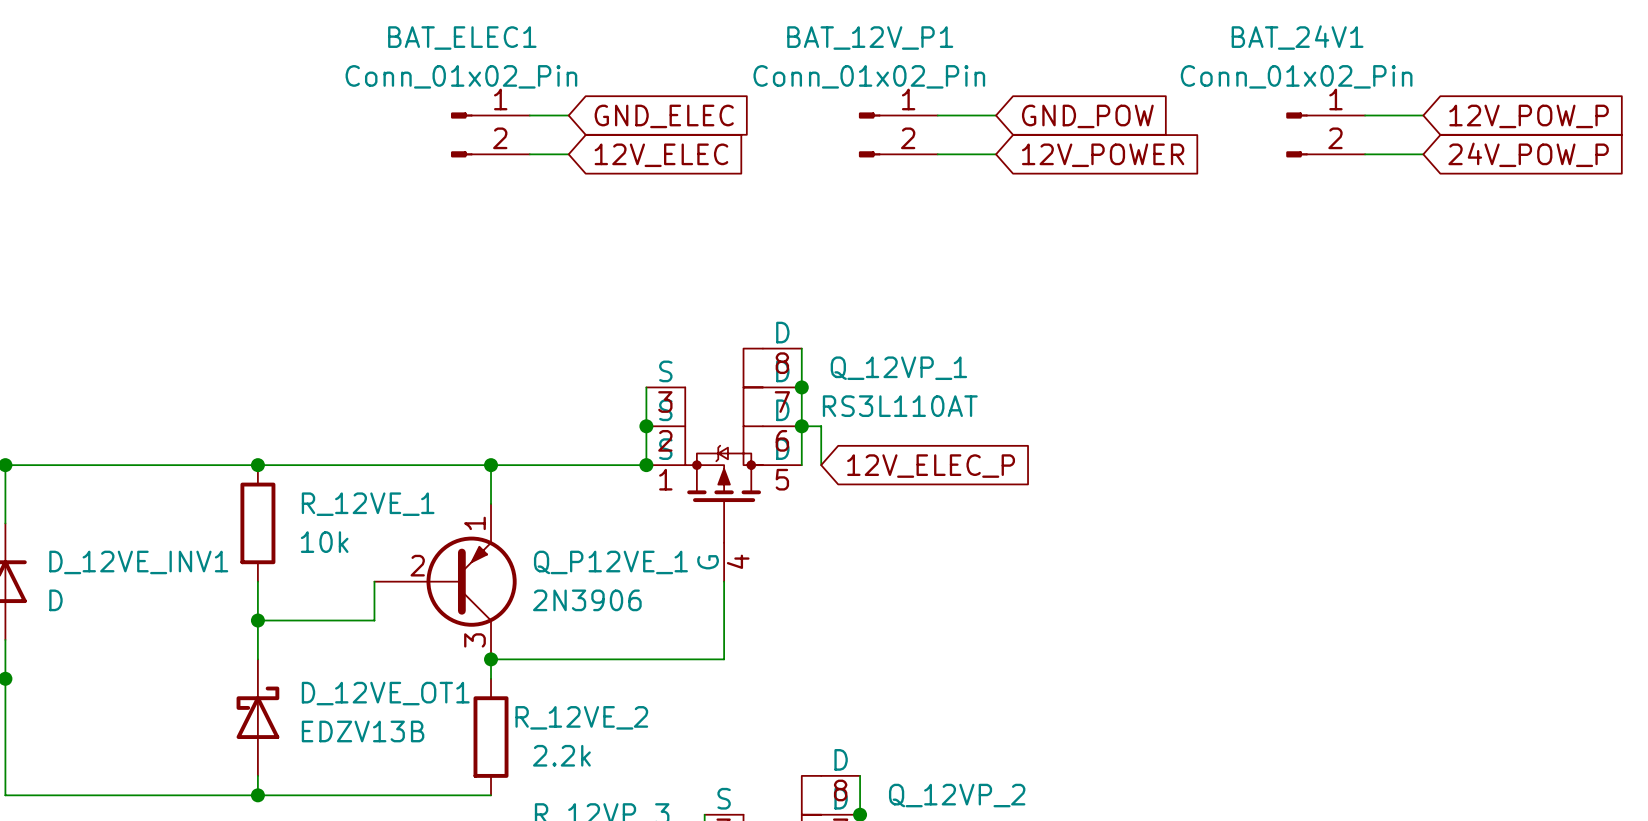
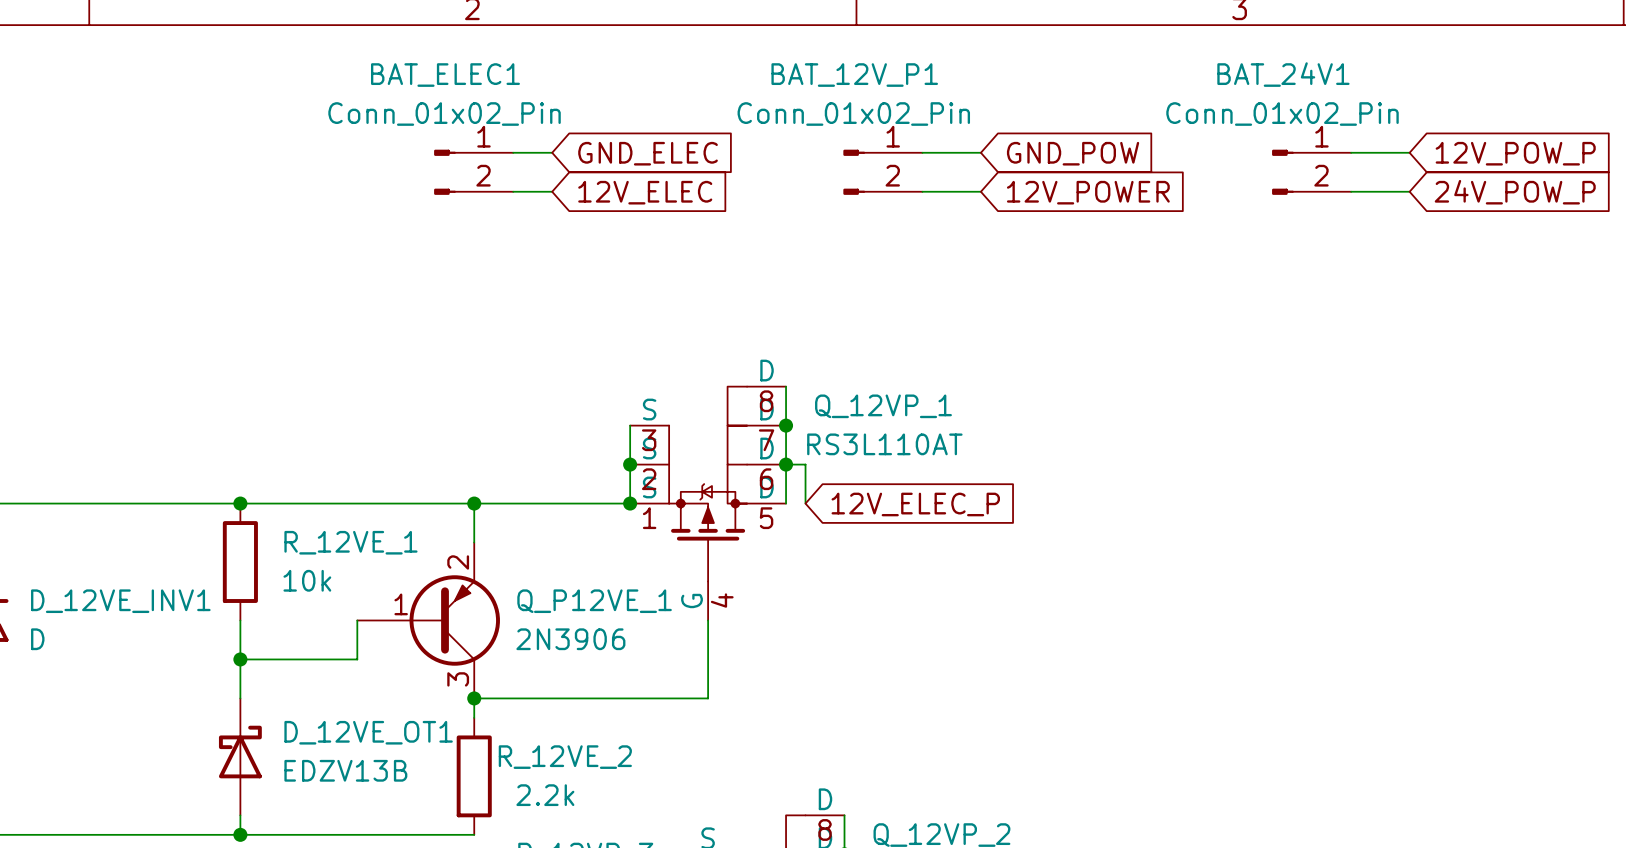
Q_P12VE_1 pin number: 1 (474, 523) -> 2 (458, 562)
Q_P12VE_1 pin number: 2 (417, 565) -> 1 (401, 604)

